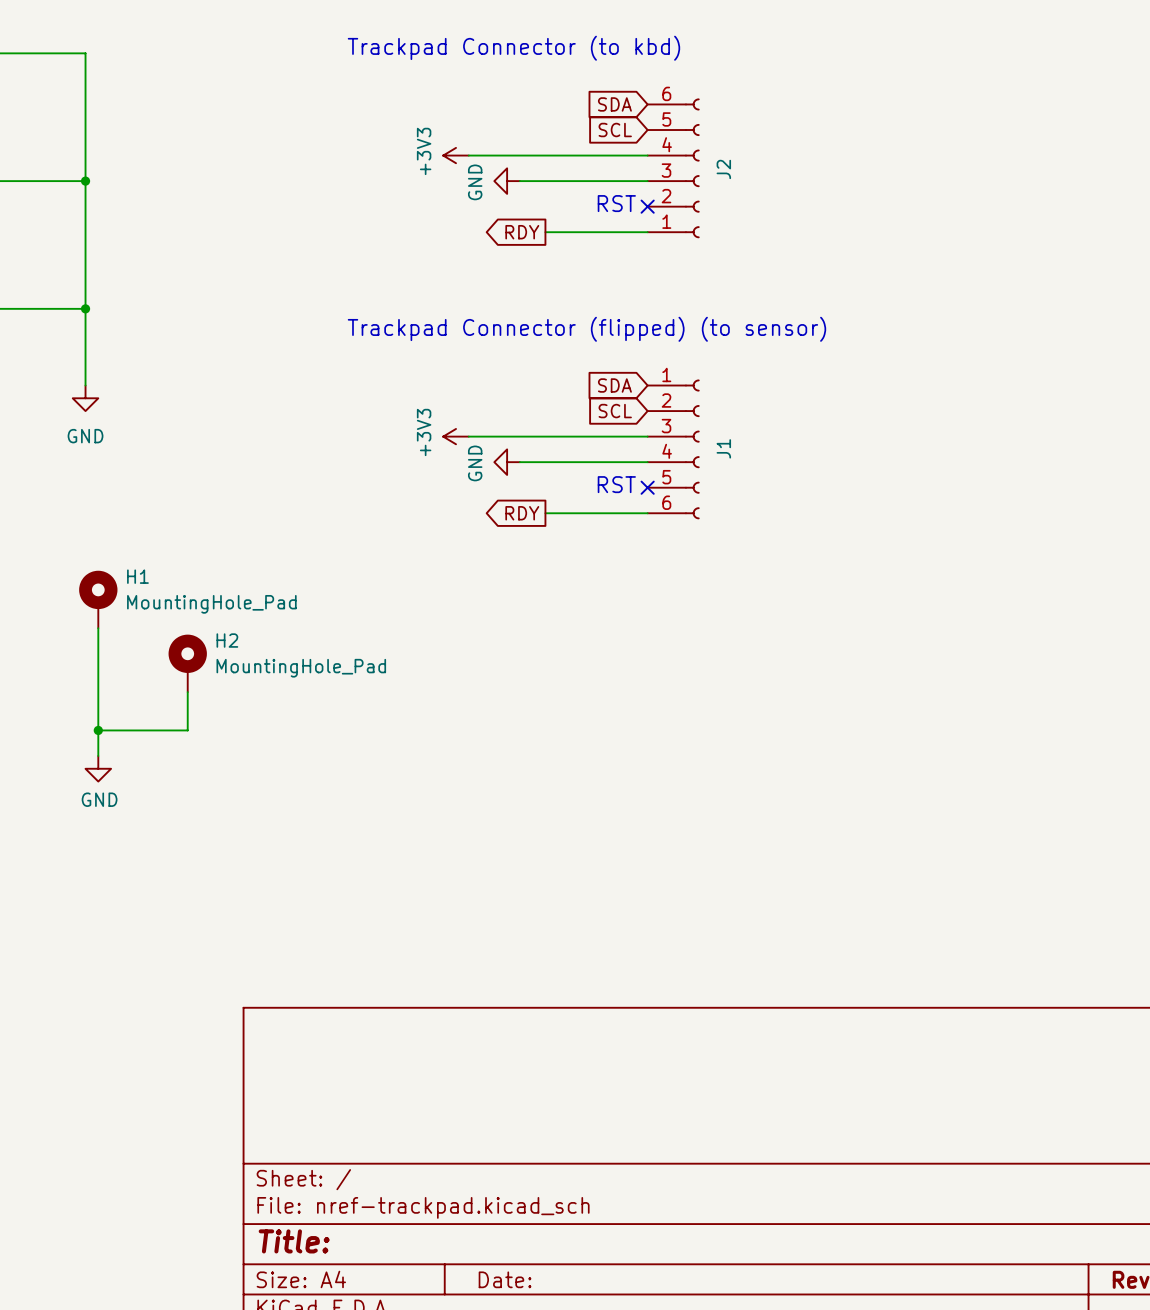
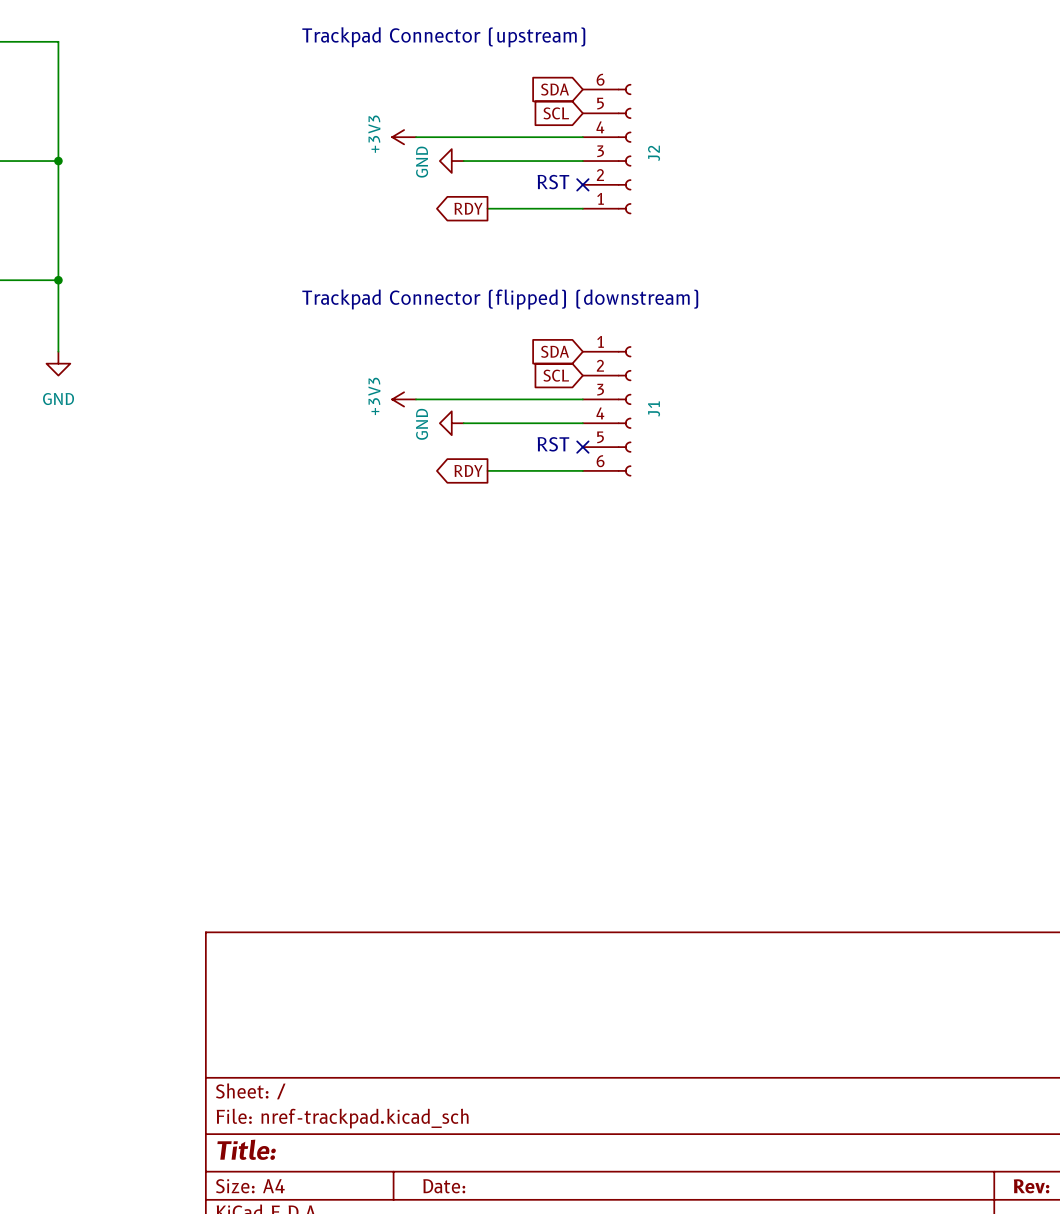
text: Trackpad Connector (to kbd) (513, 48) -> Trackpad Connector (upstream) (443, 37)
text: Trackpad Connector (flipped) (to sensor) (586, 329) -> Trackpad Connector (flipped) (downstream) (500, 299)
H1: MountingHole_Pad (98, 599) -> none
wire: (98, 628) (98, 755) -> none
H2: MountingHole_Pad (187, 663) -> none
wire: (187, 692) (187, 730) (98, 730) -> none
junction: (98, 730) -> none
power symbol: GND (98, 768) -> none

